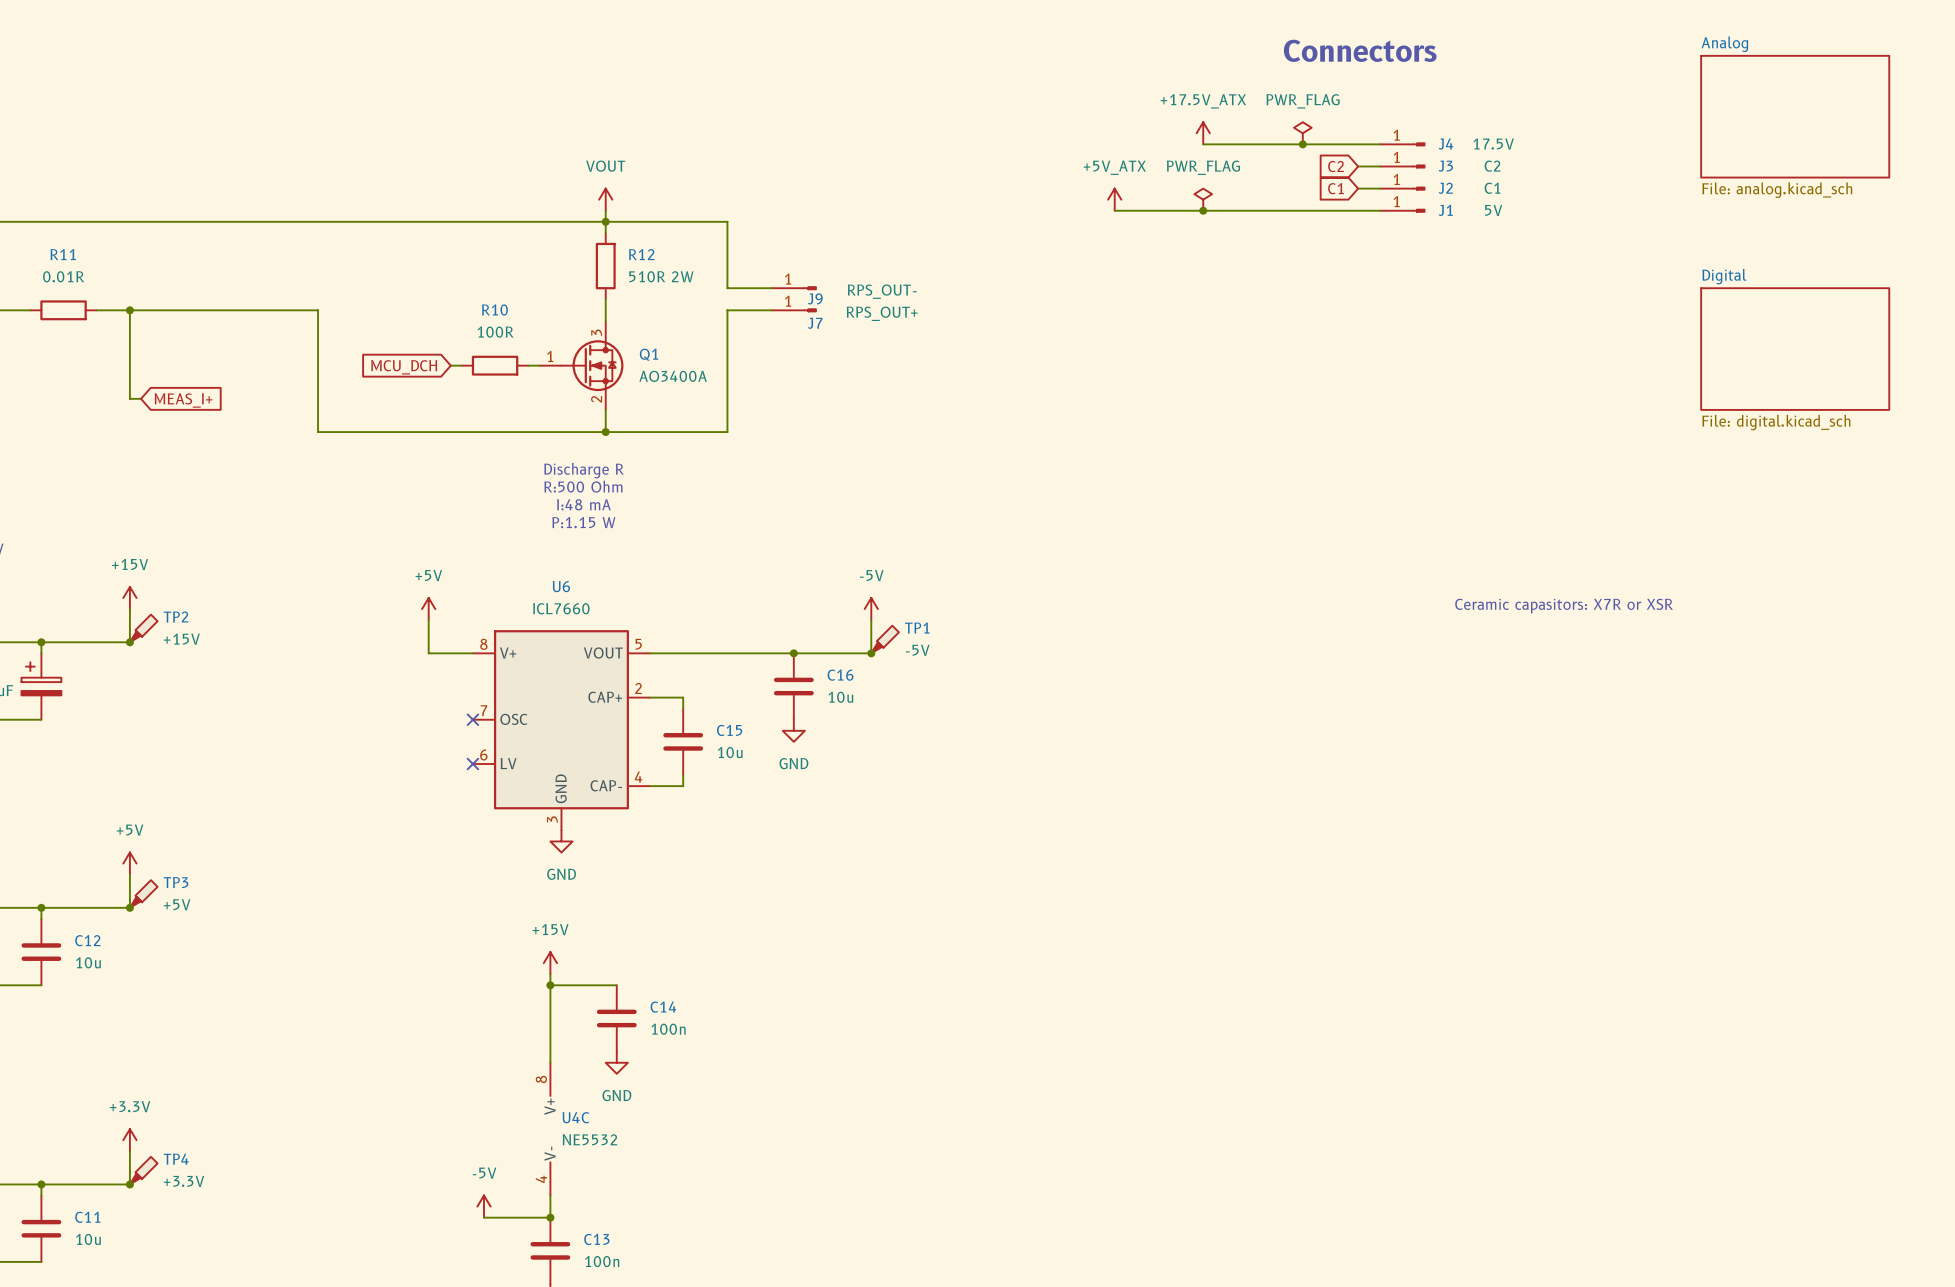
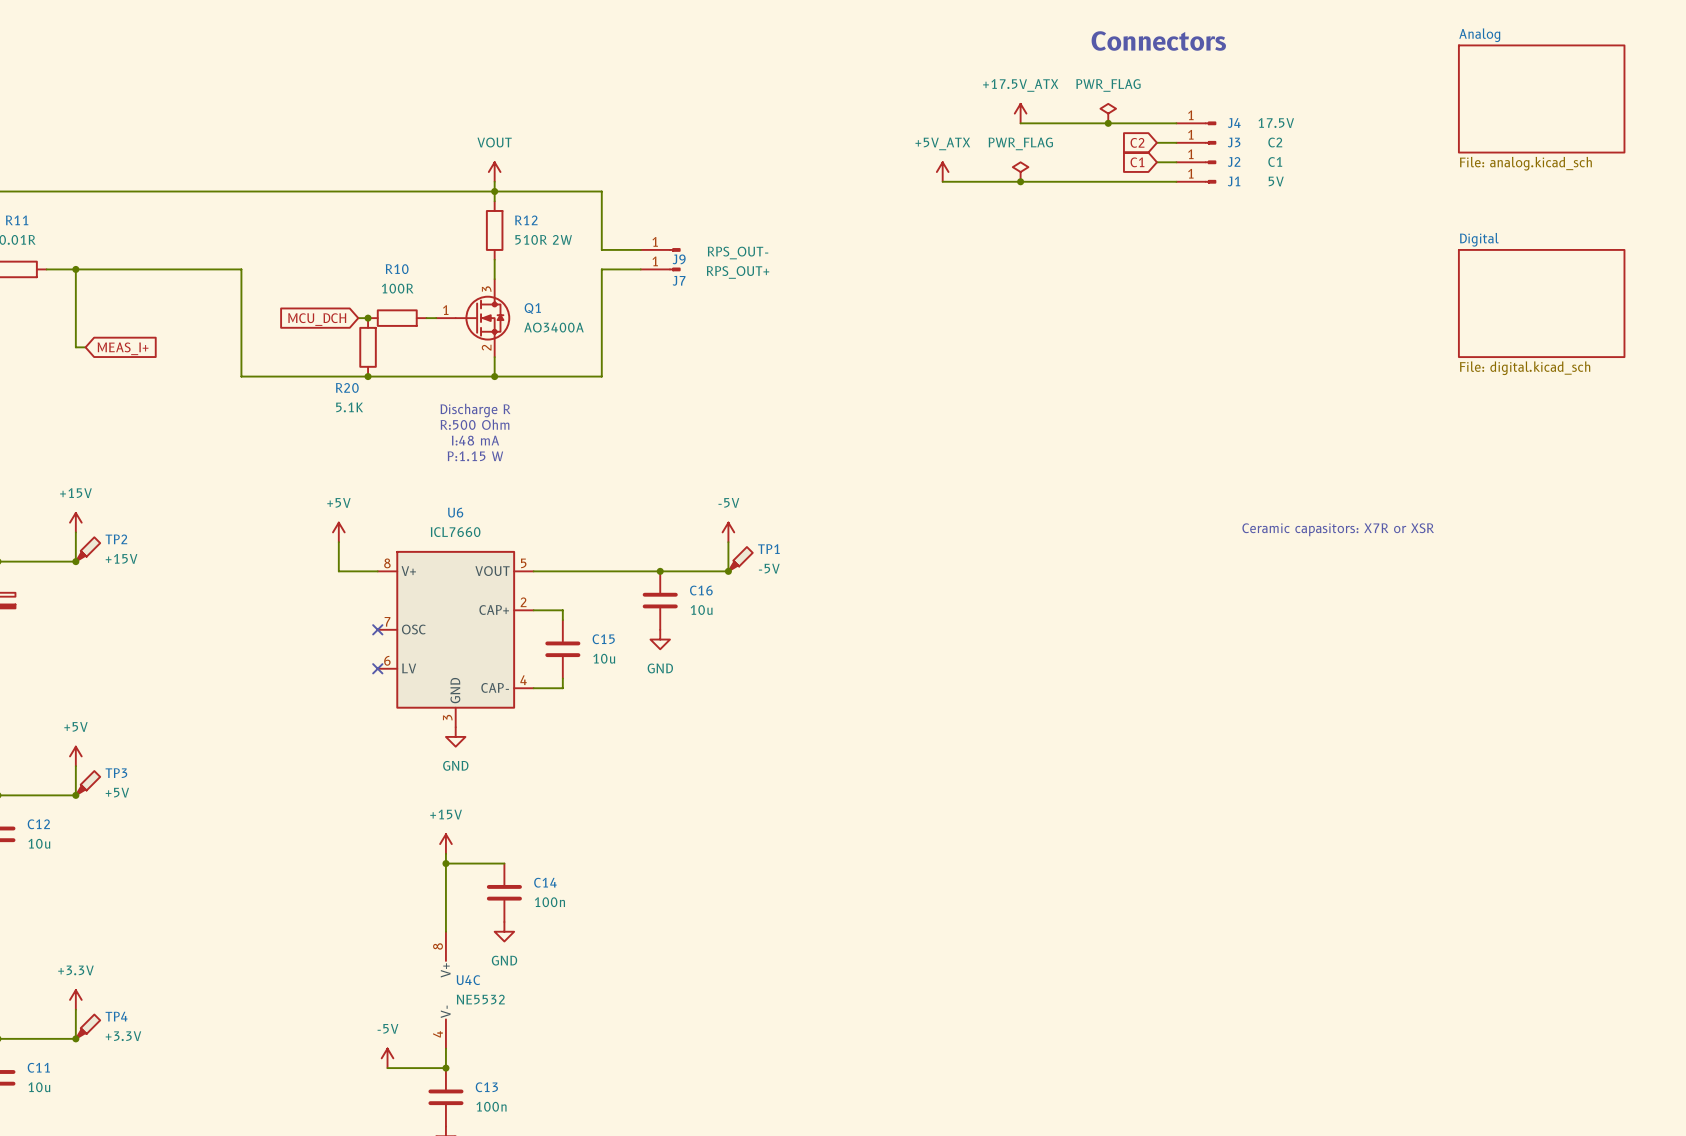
junction: none -> (368, 318)
R20: none -> 5.1K (368, 347)
junction: none -> (368, 376)

